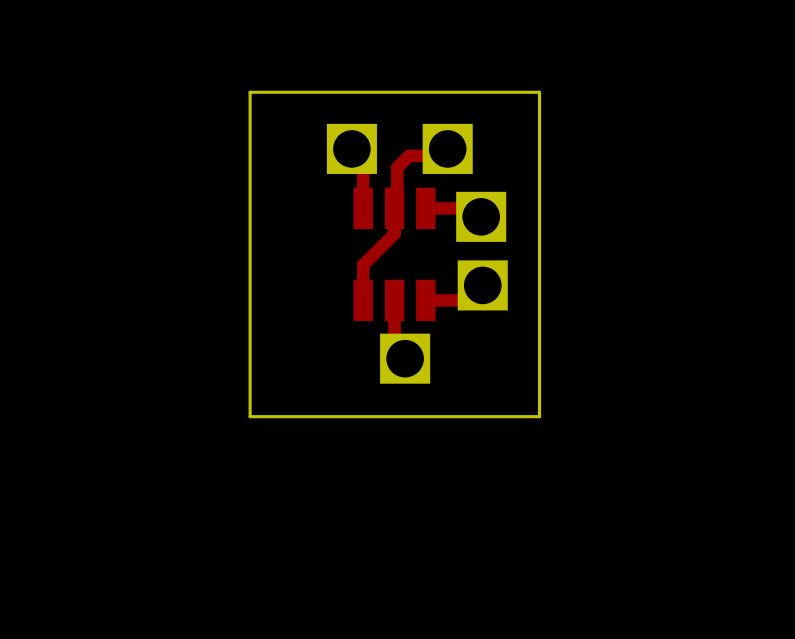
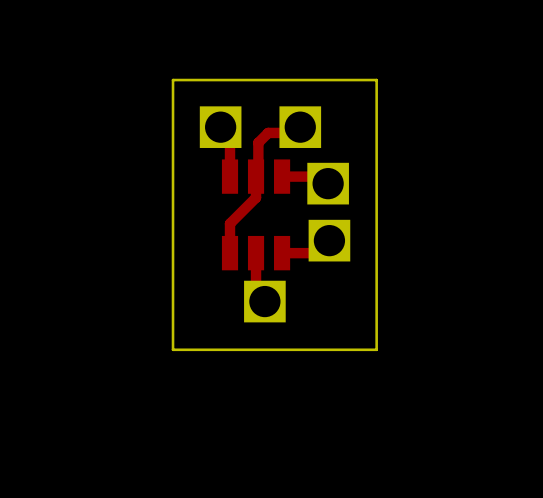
board edge: (294, 92) (250, 92) (250, 416) (294, 416) -> (173, 80) (173, 349)

